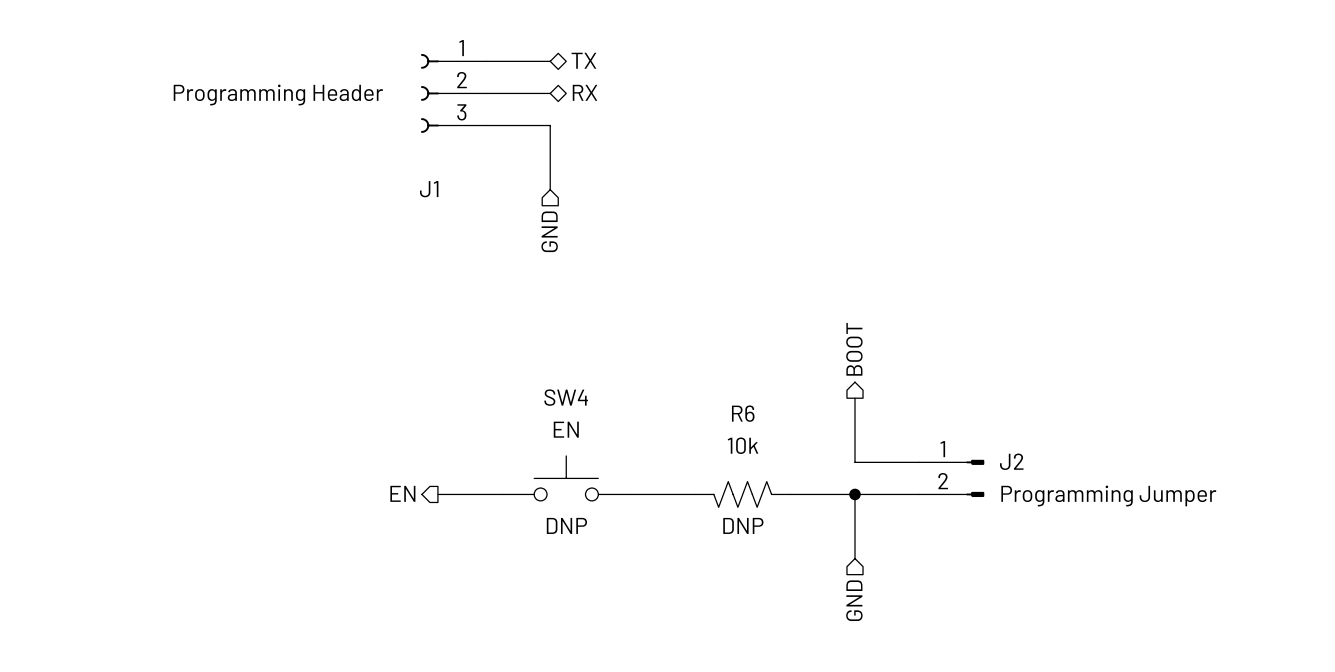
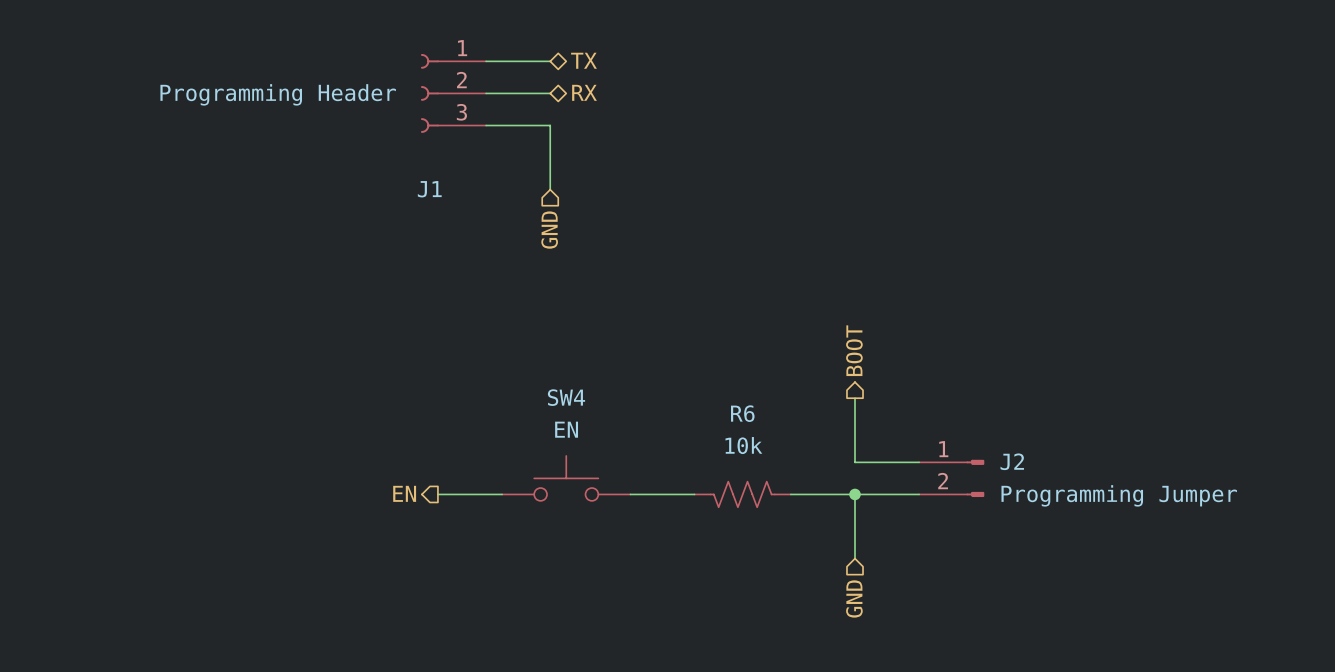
SW4 text: DNP (566, 525) -> none
R6 text: DNP (743, 525) -> none

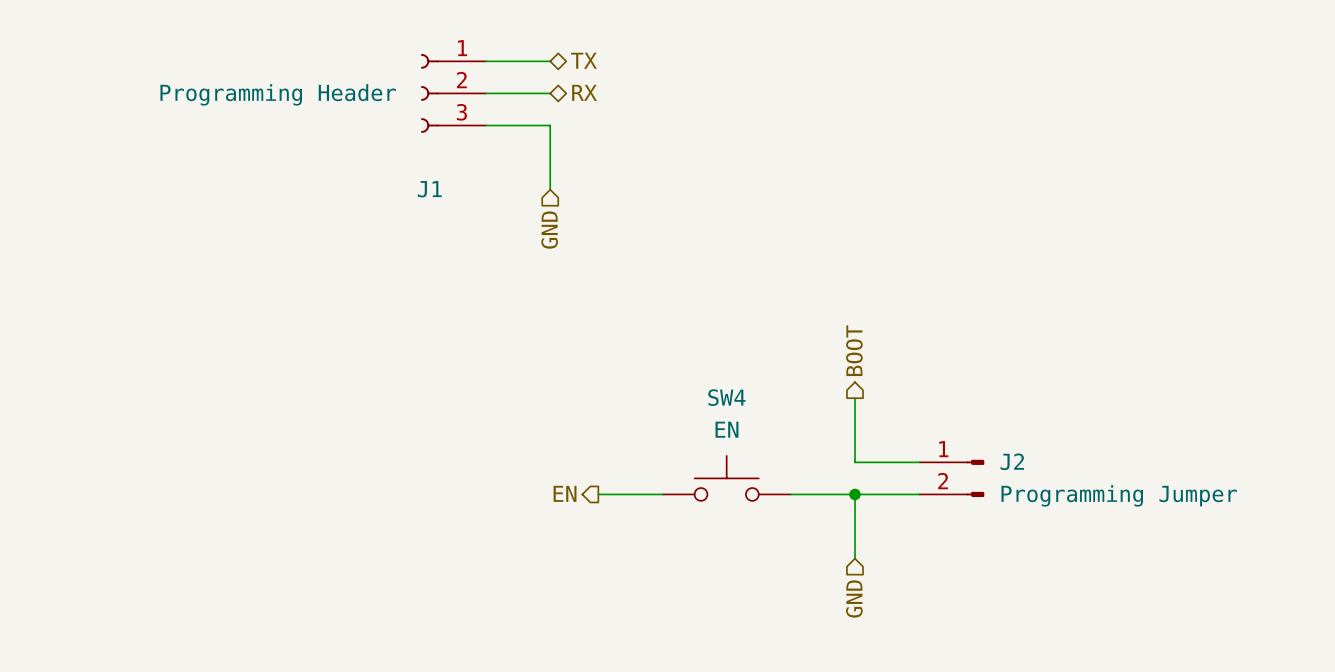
SW4 position: (566, 478) -> (726, 478)
hierarchical label position: EN (404, 493) -> EN (565, 493)
wire: (437, 494) (502, 494) -> none
R6: 10k (742, 494) -> none

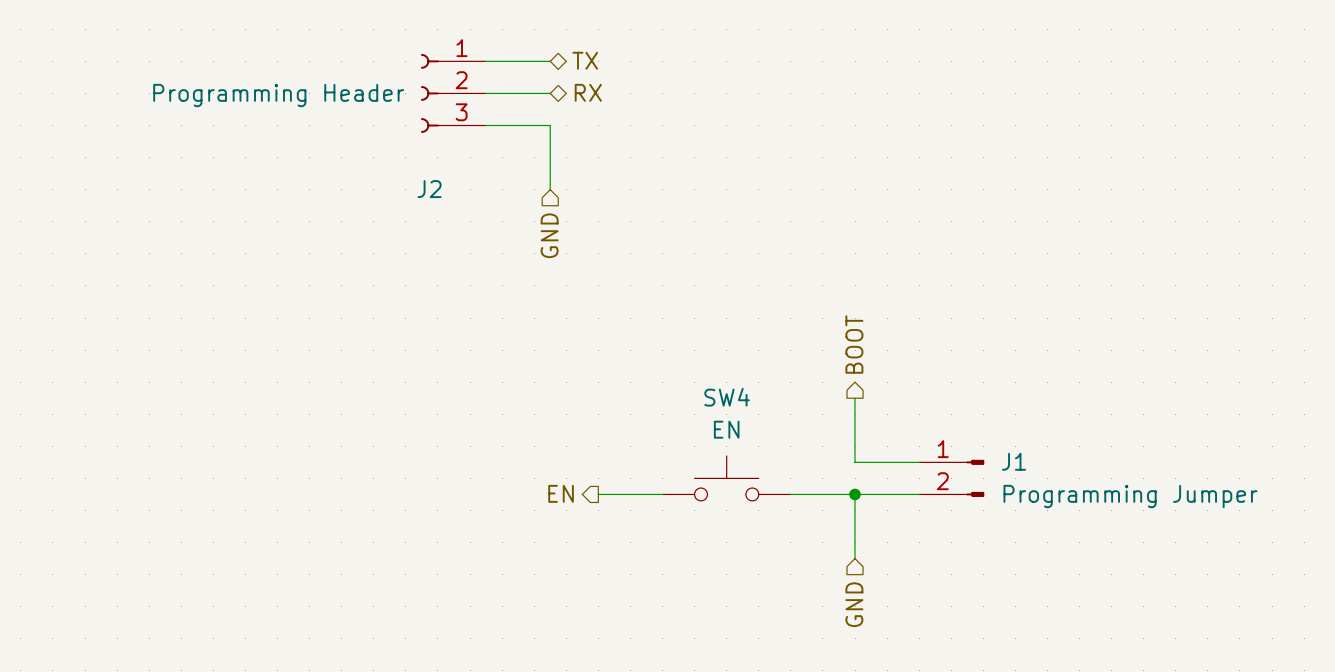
J1 name: J1 (429, 189) -> J2 (429, 189)
J2 name: J2 (1012, 461) -> J1 (1013, 461)

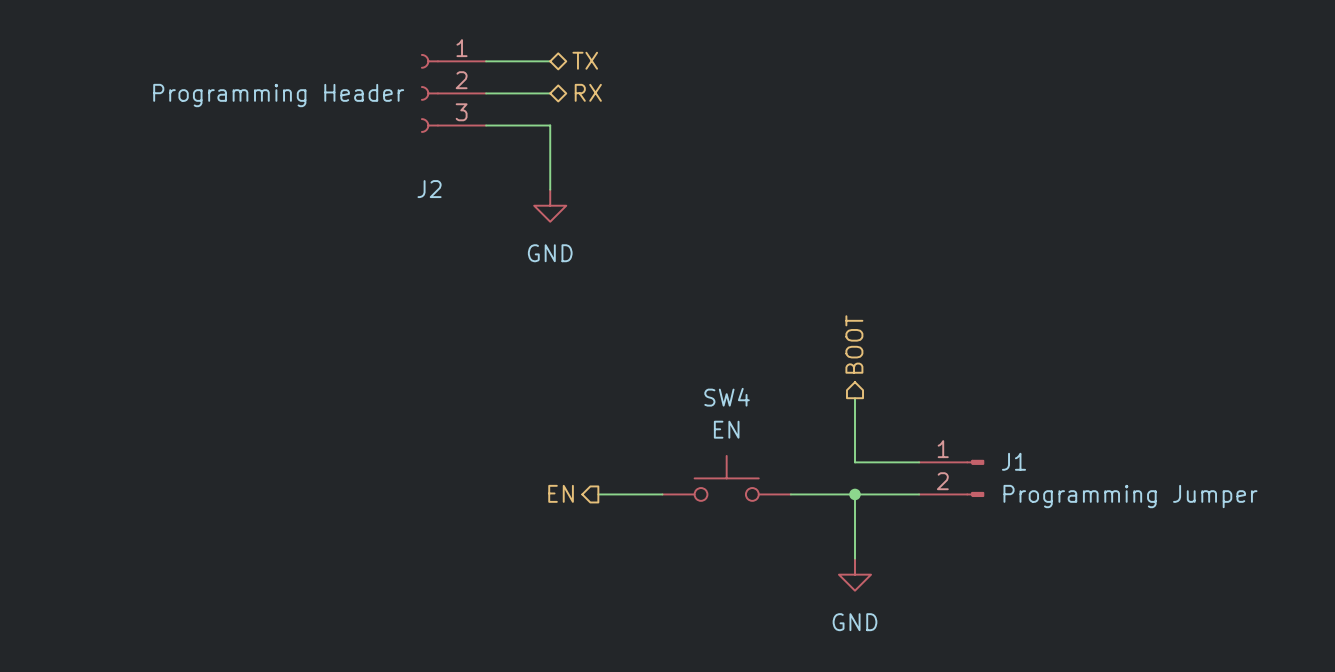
power symbol: none -> GND (550, 205)
hierarchical label: GND (549, 235) -> none
power symbol: none -> GND (855, 574)
hierarchical label: GND (854, 604) -> none

